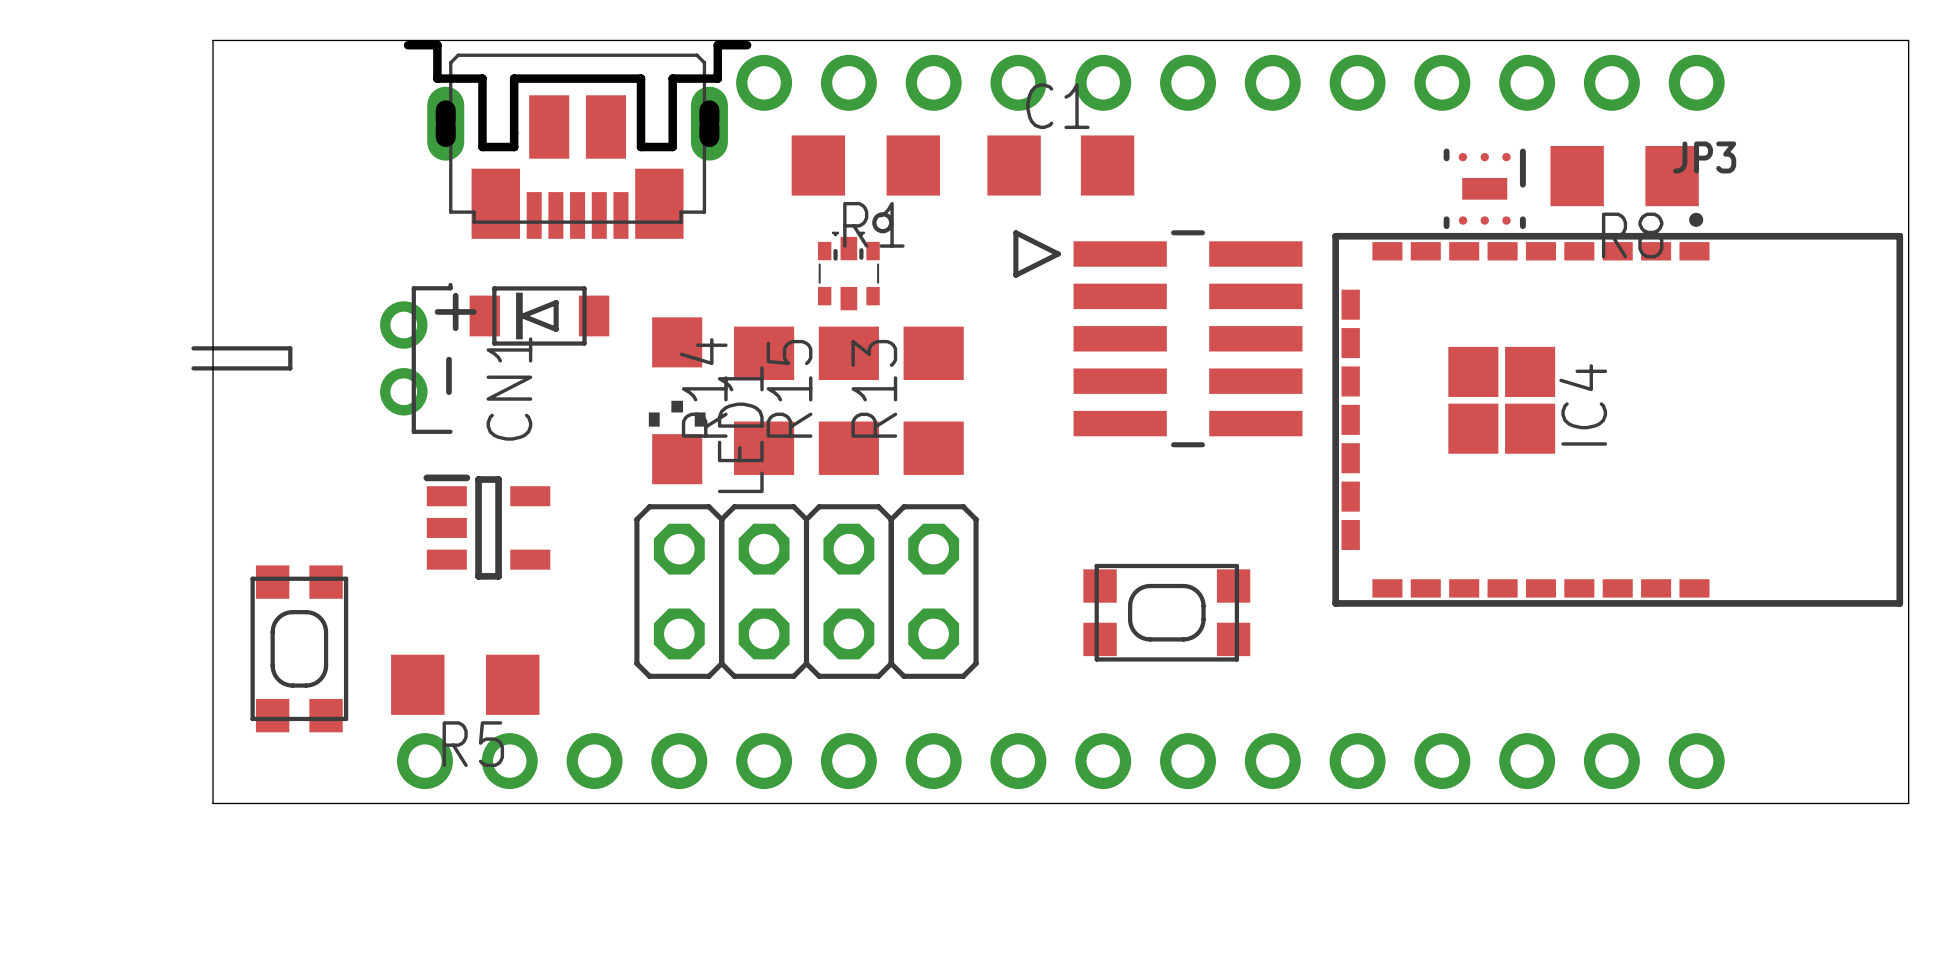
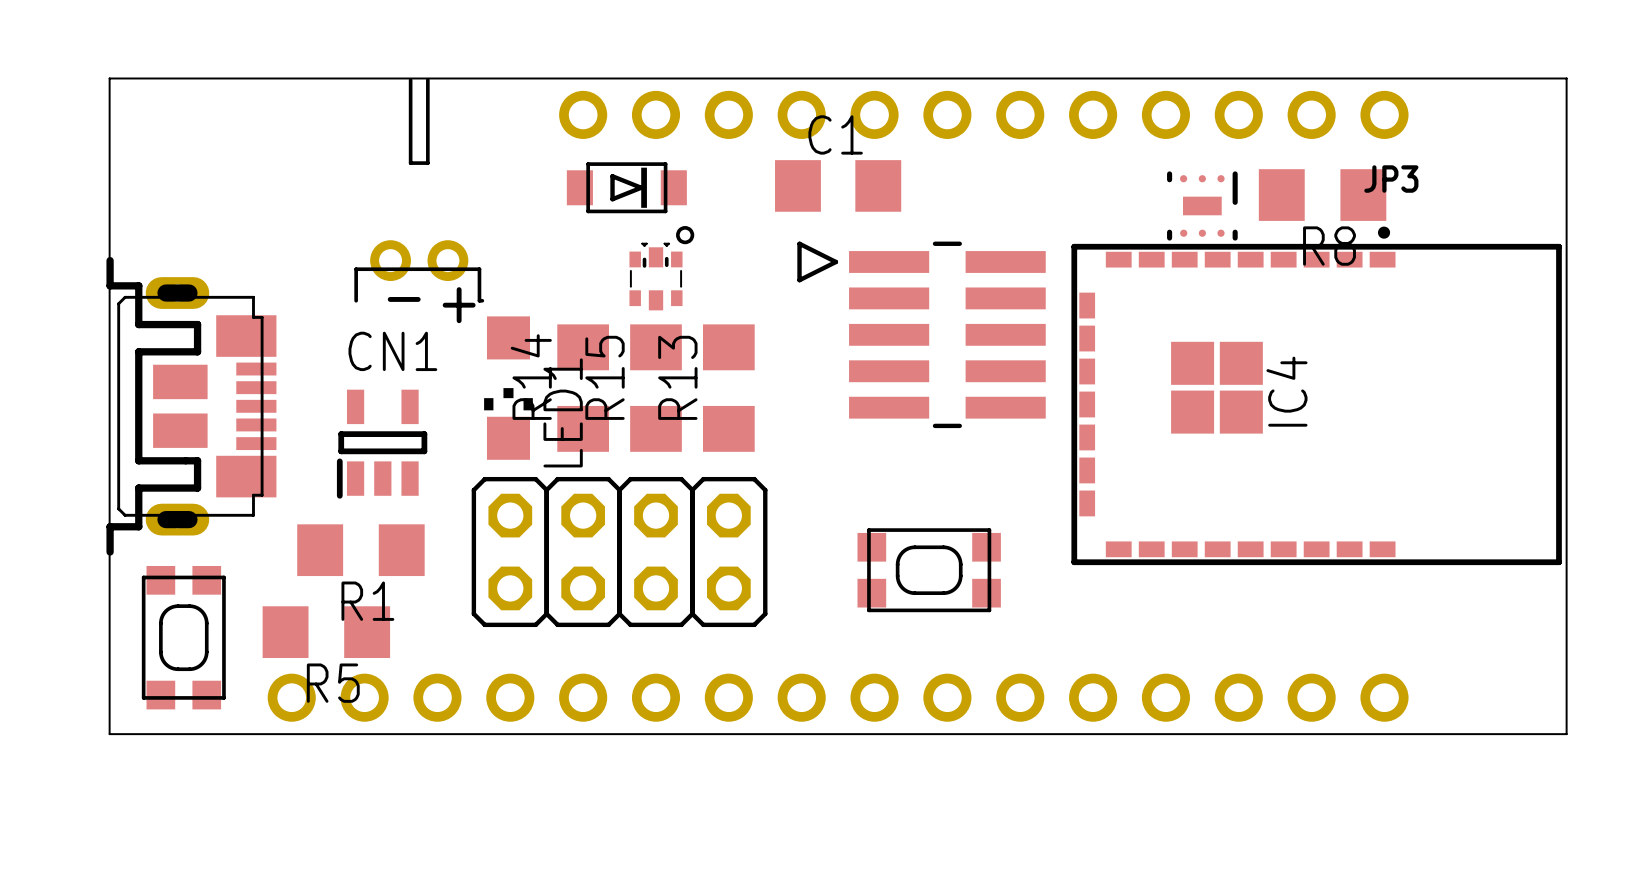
part rotation: 0° (577, 139) -> 90° counterclockwise (191, 406)
part position: (577, 139) -> (191, 406)
R1 position: (865, 165) -> (360, 550)
part rotation: 0° (539, 315) -> 180° (626, 187)
part position: (539, 315) -> (626, 187)
CN1 rotation: 0° (322, 358) -> 90° clockwise (419, 190)
CN1 position: (322, 358) -> (419, 190)
part rotation: 0° (486, 527) -> 90° counterclockwise (382, 444)
part position: (299, 648) -> (183, 637)

